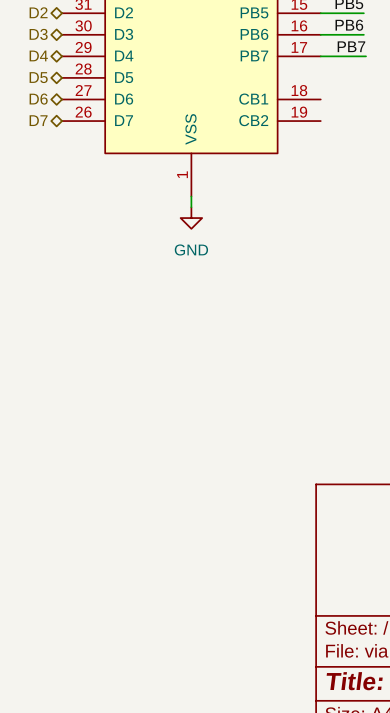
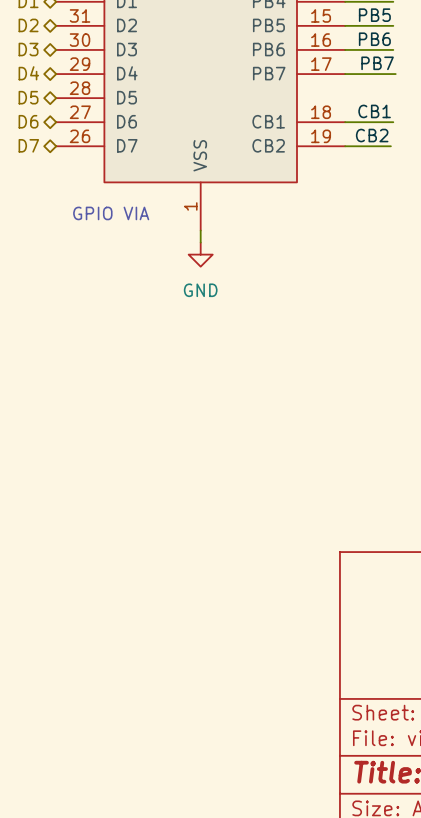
label: none -> CB1 (374, 111)
wire: none -> (345, 122) (393, 122)
label: none -> CB2 (372, 135)
wire: none -> (345, 146) (390, 146)
text: none -> GPIO VIA (111, 213)

